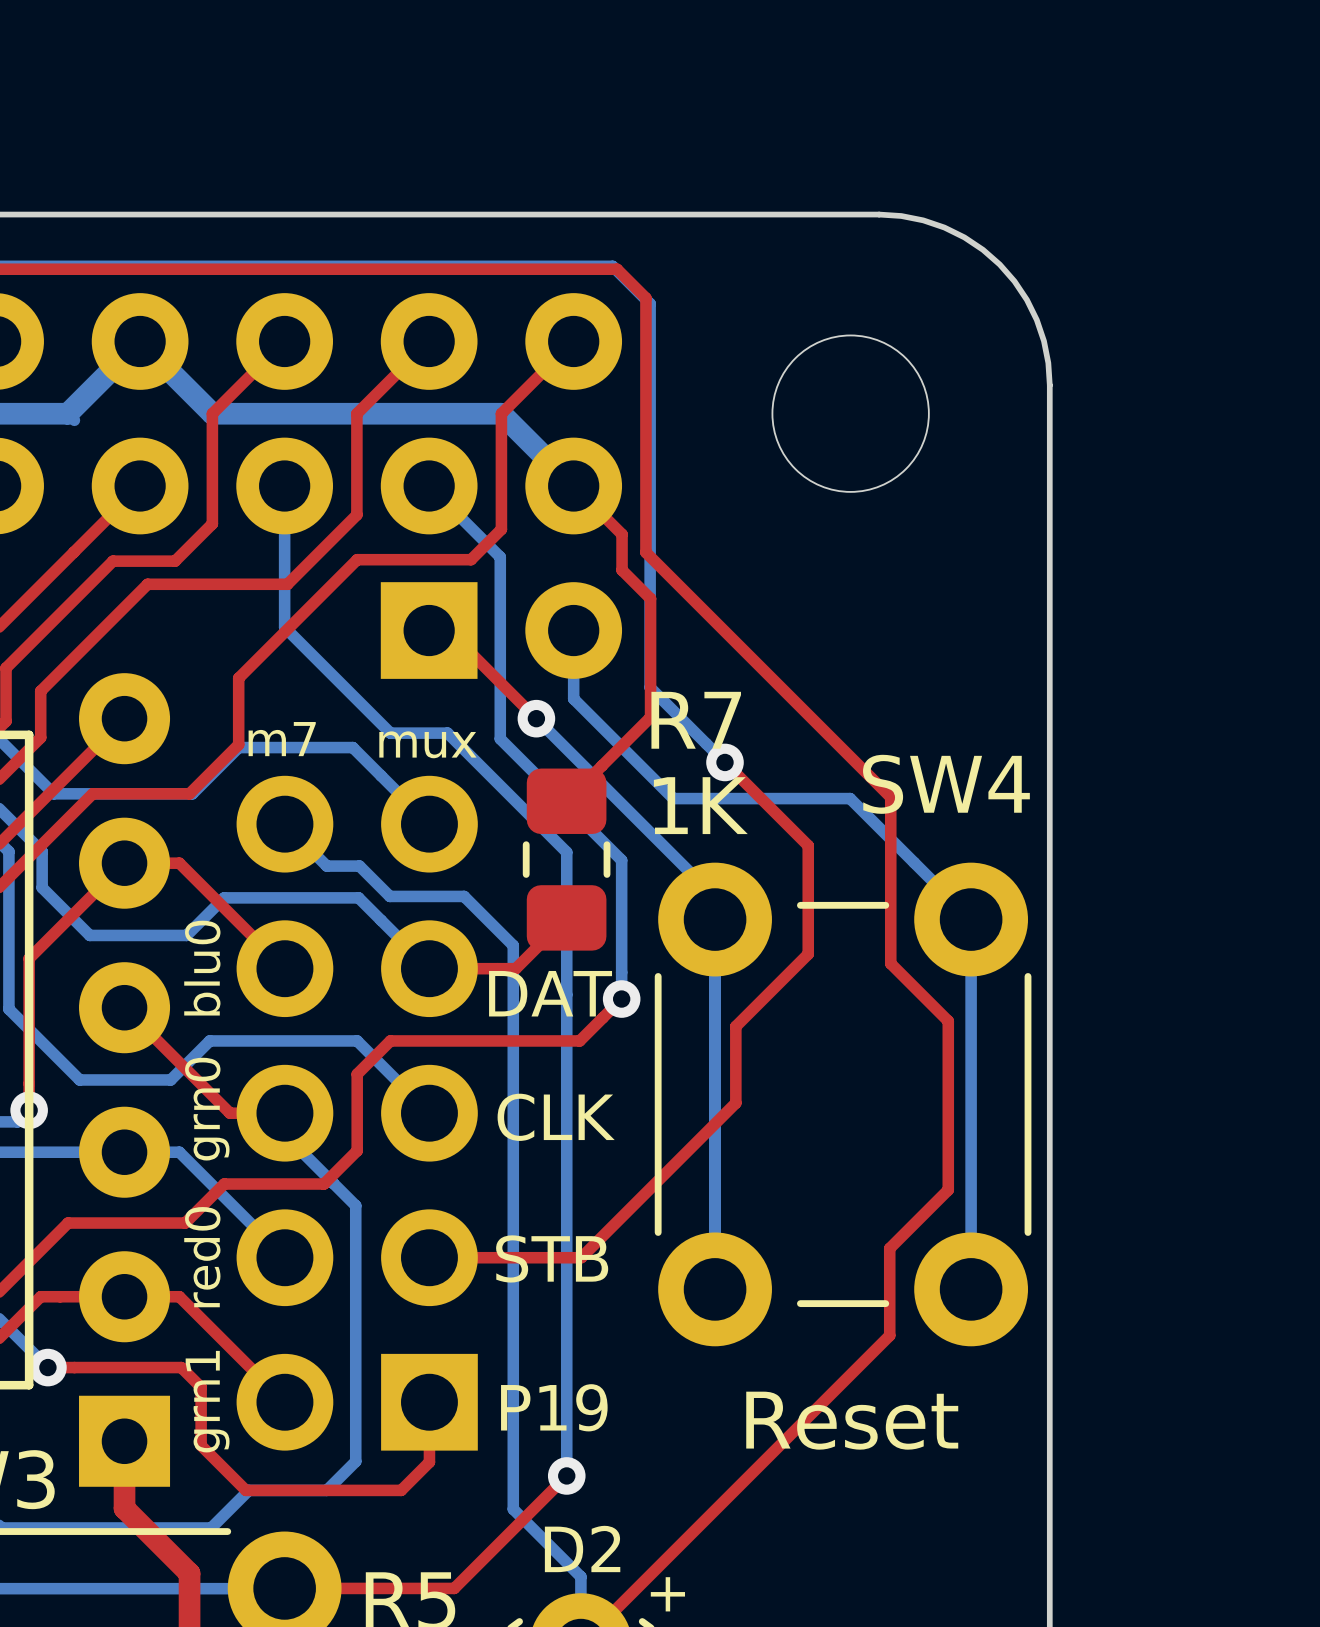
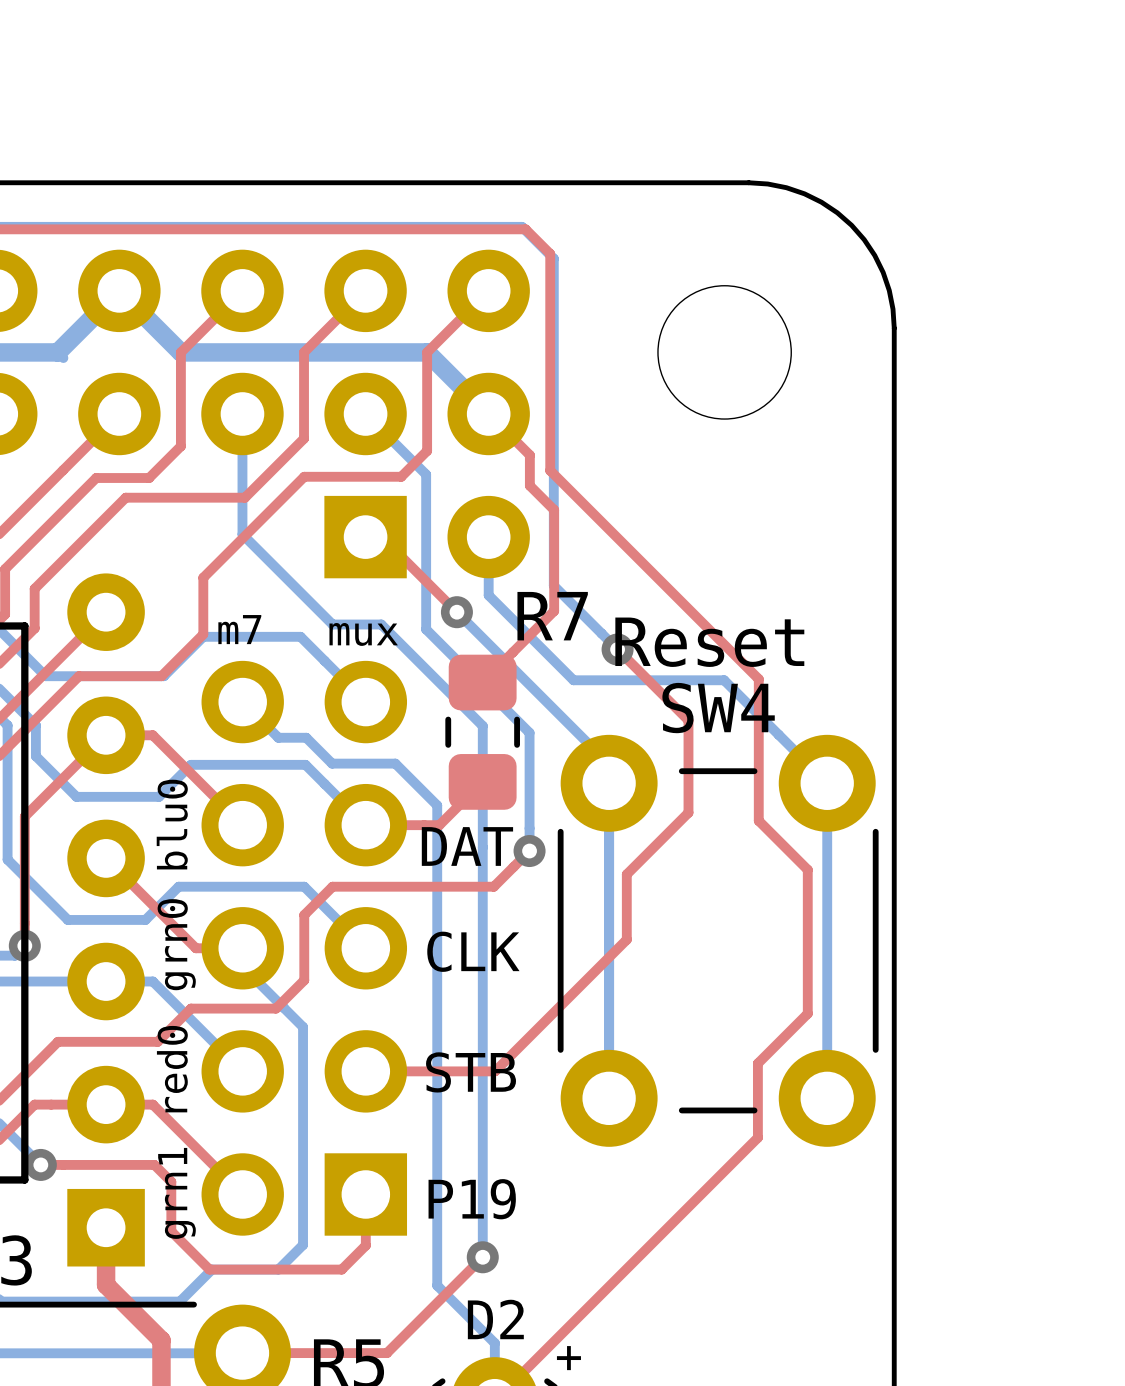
R7 name position: R7 (696, 720) -> R7 (552, 616)
SW4 name position: SW4 (946, 784) -> SW4 (718, 708)
R7 value: 1K (700, 805) -> none
text position: Reset (852, 1420) -> Reset (709, 642)

